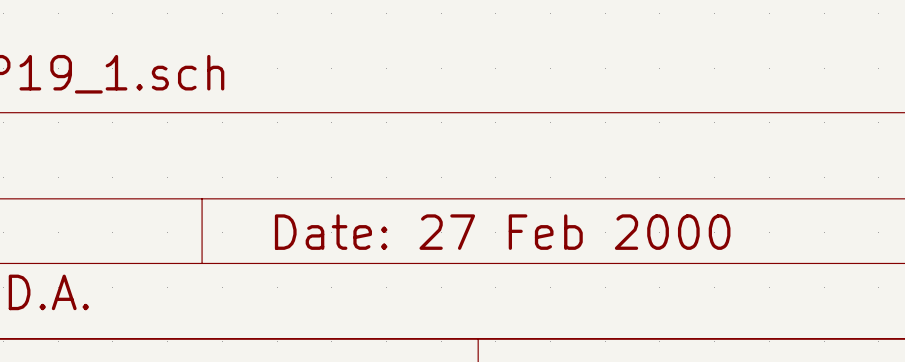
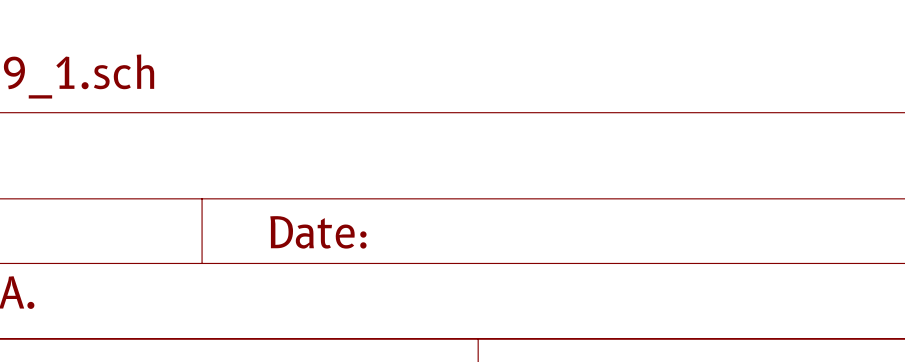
title block: Date: 27 Feb 2000 (502, 232) -> Date: (318, 232)

